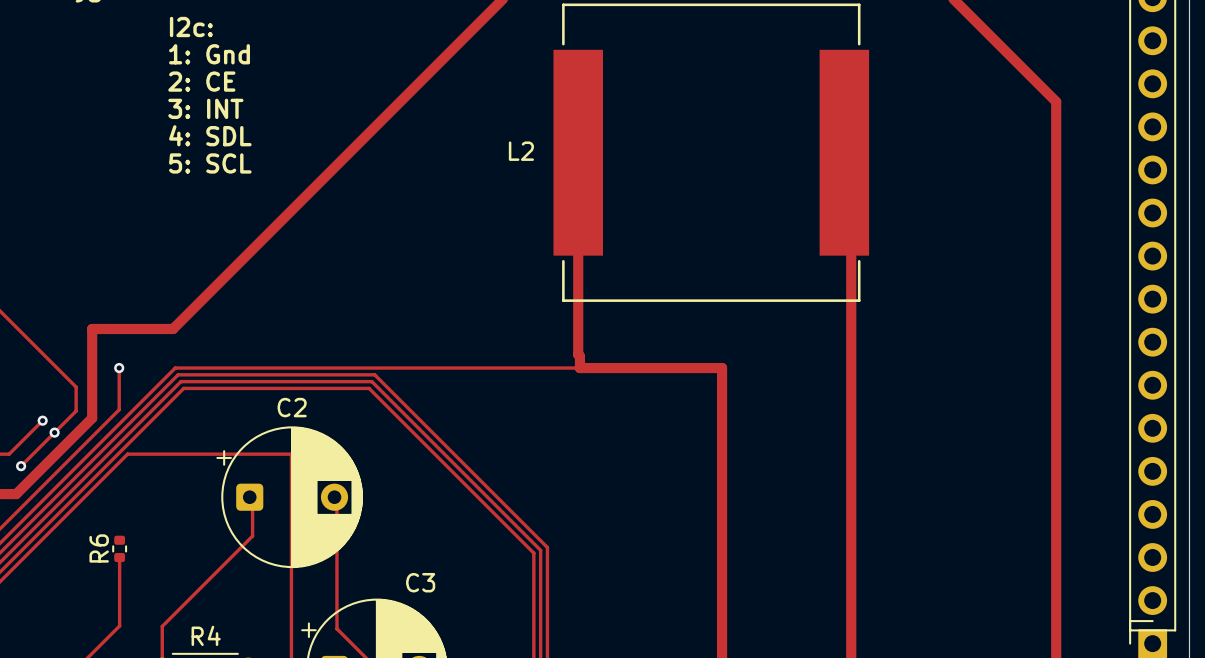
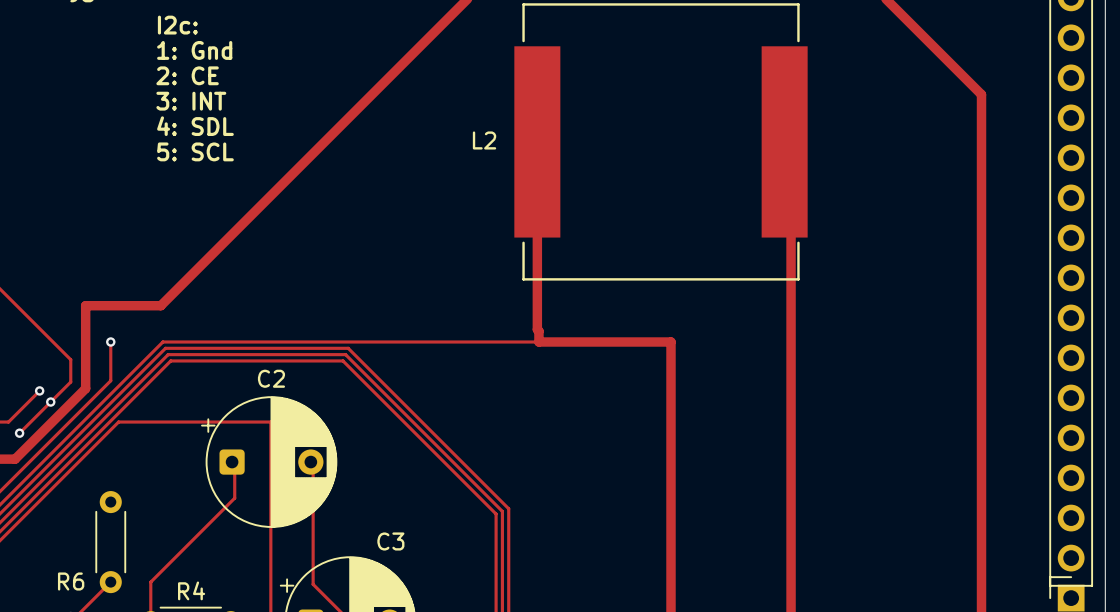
R6 footprint: [112, 535, 128, 563] -> [95, 491, 127, 594]
R6 name position: R6 (99, 548) -> R6 (71, 581)
track: (119, 557) (119, 626) -> none

